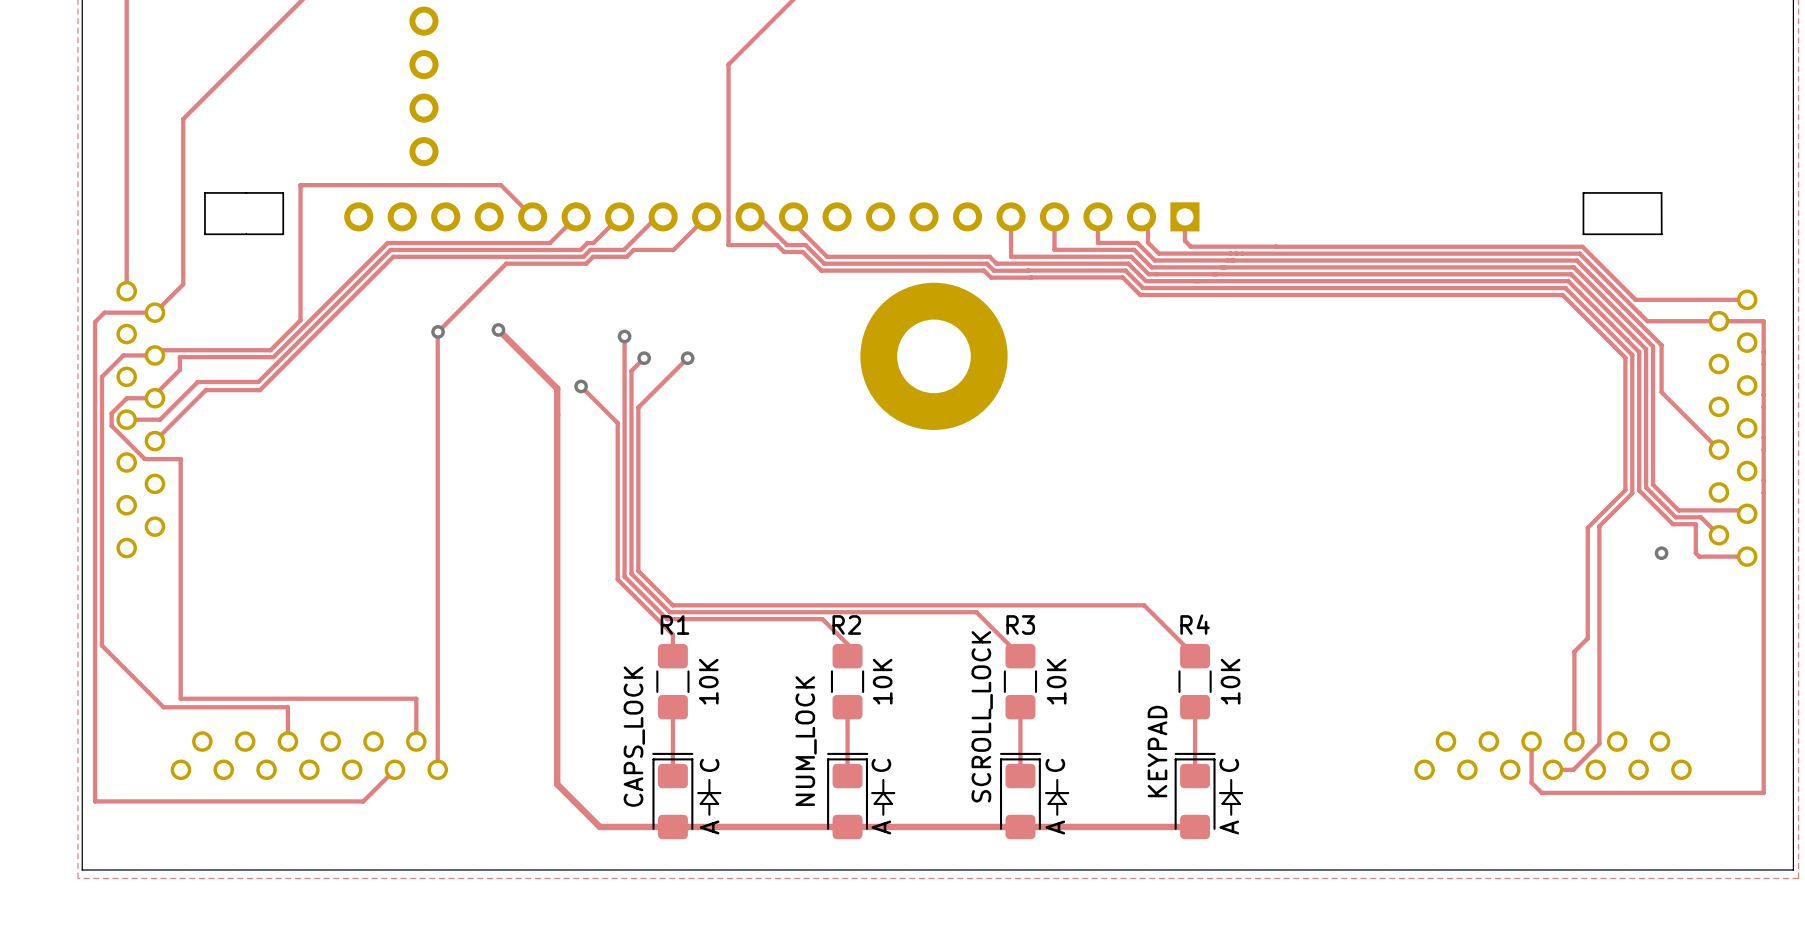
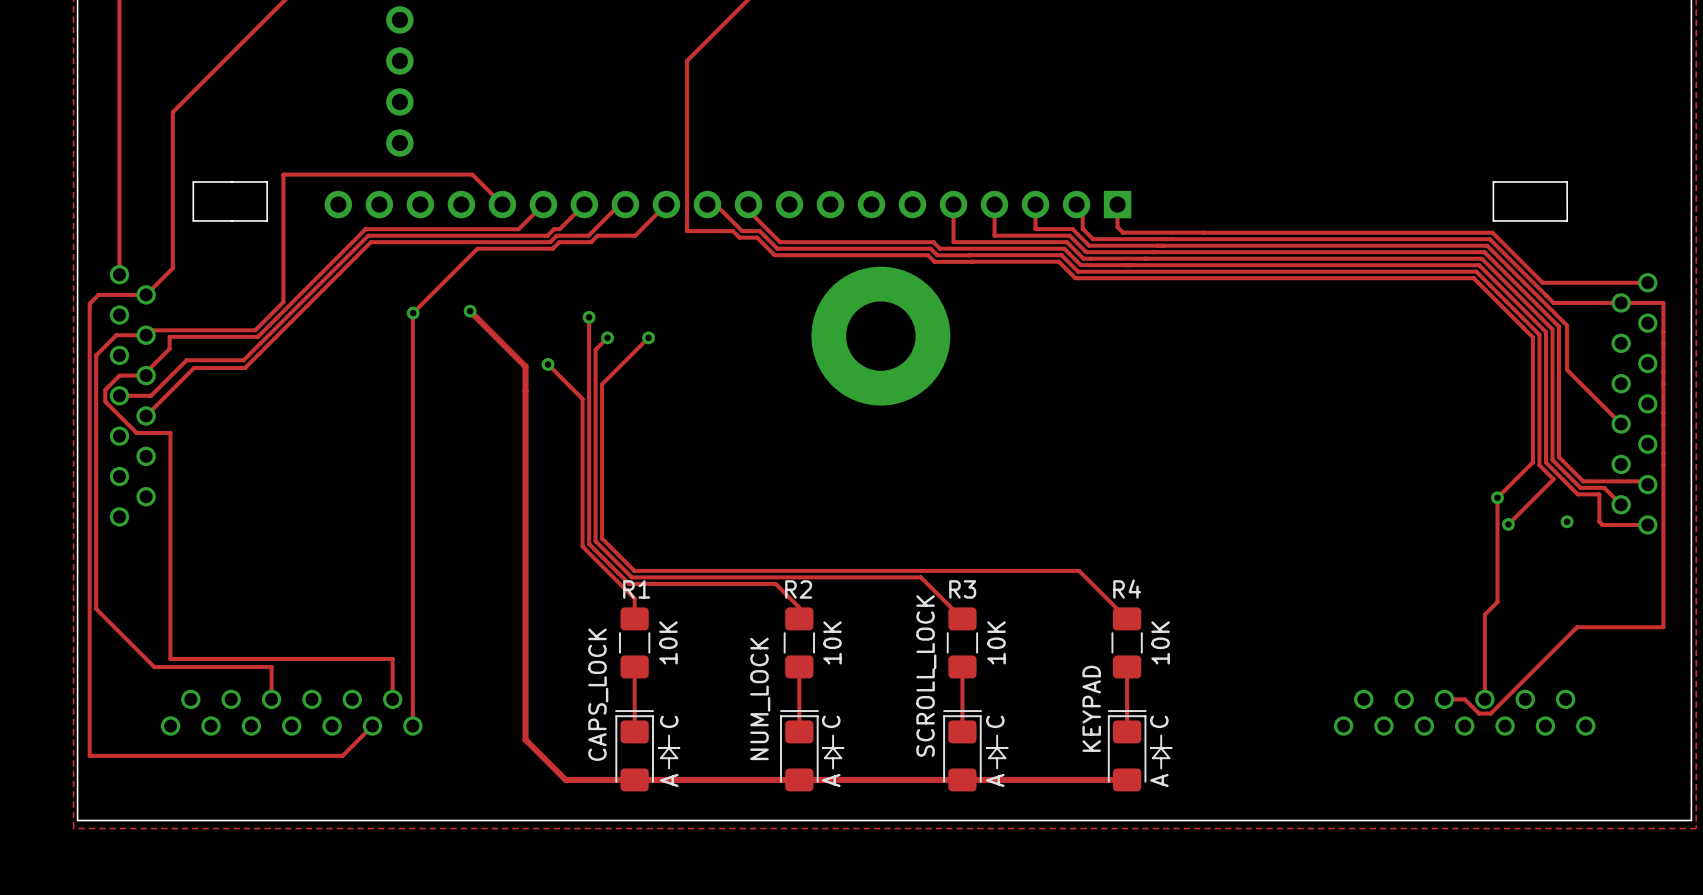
track: (1632, 493) (1599, 526) (1599, 743) (1573, 769) (1553, 769) -> (1539, 465) (1553, 479) (1508, 524)
via: none -> (1497, 497)
via: none -> (1508, 524)
track: (1763, 665) (1763, 792) (1541, 792) (1531, 782) (1531, 741) -> (1663, 627) (1577, 627) (1490, 713) (1478, 713) (1464, 699) (1444, 699)

